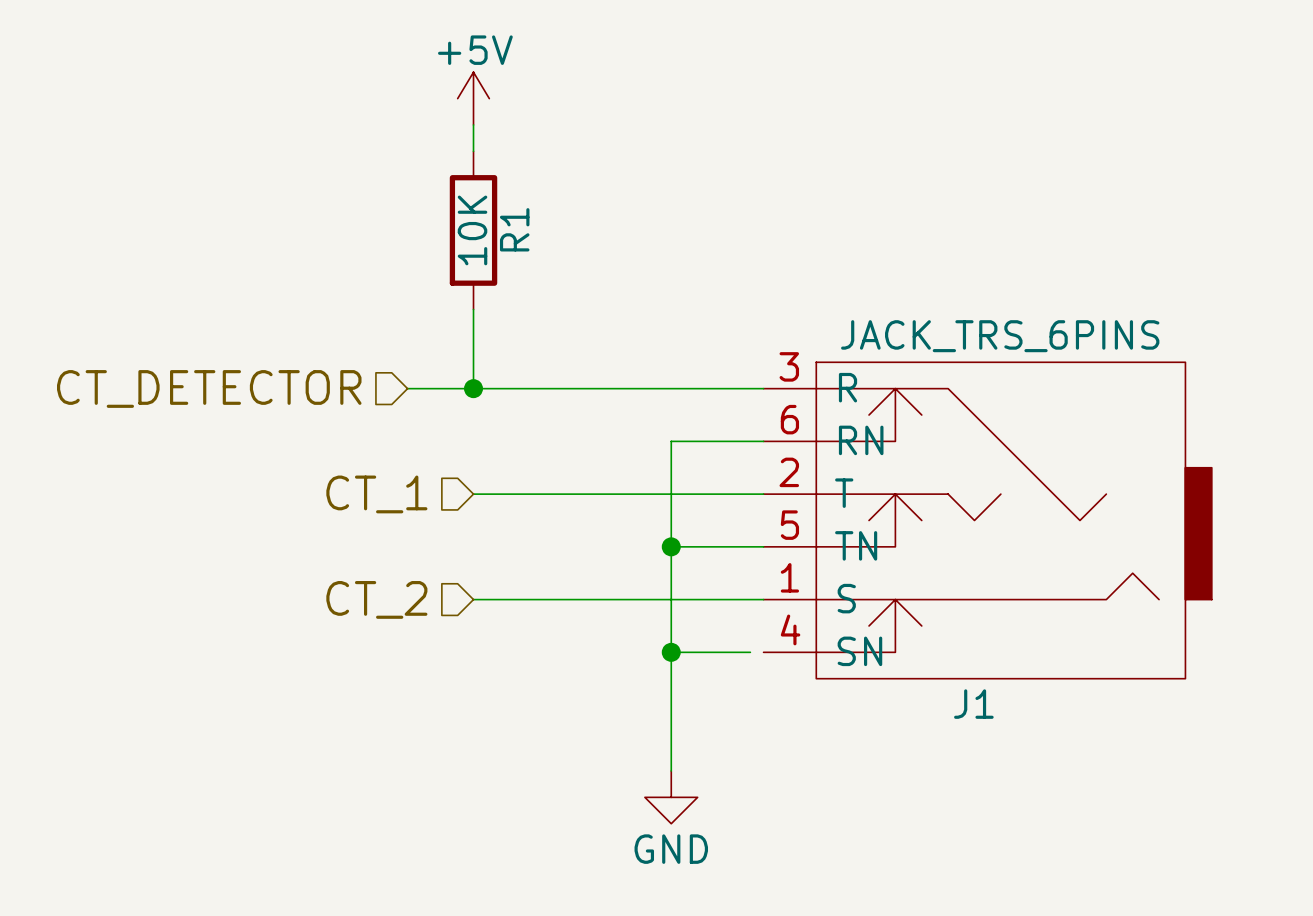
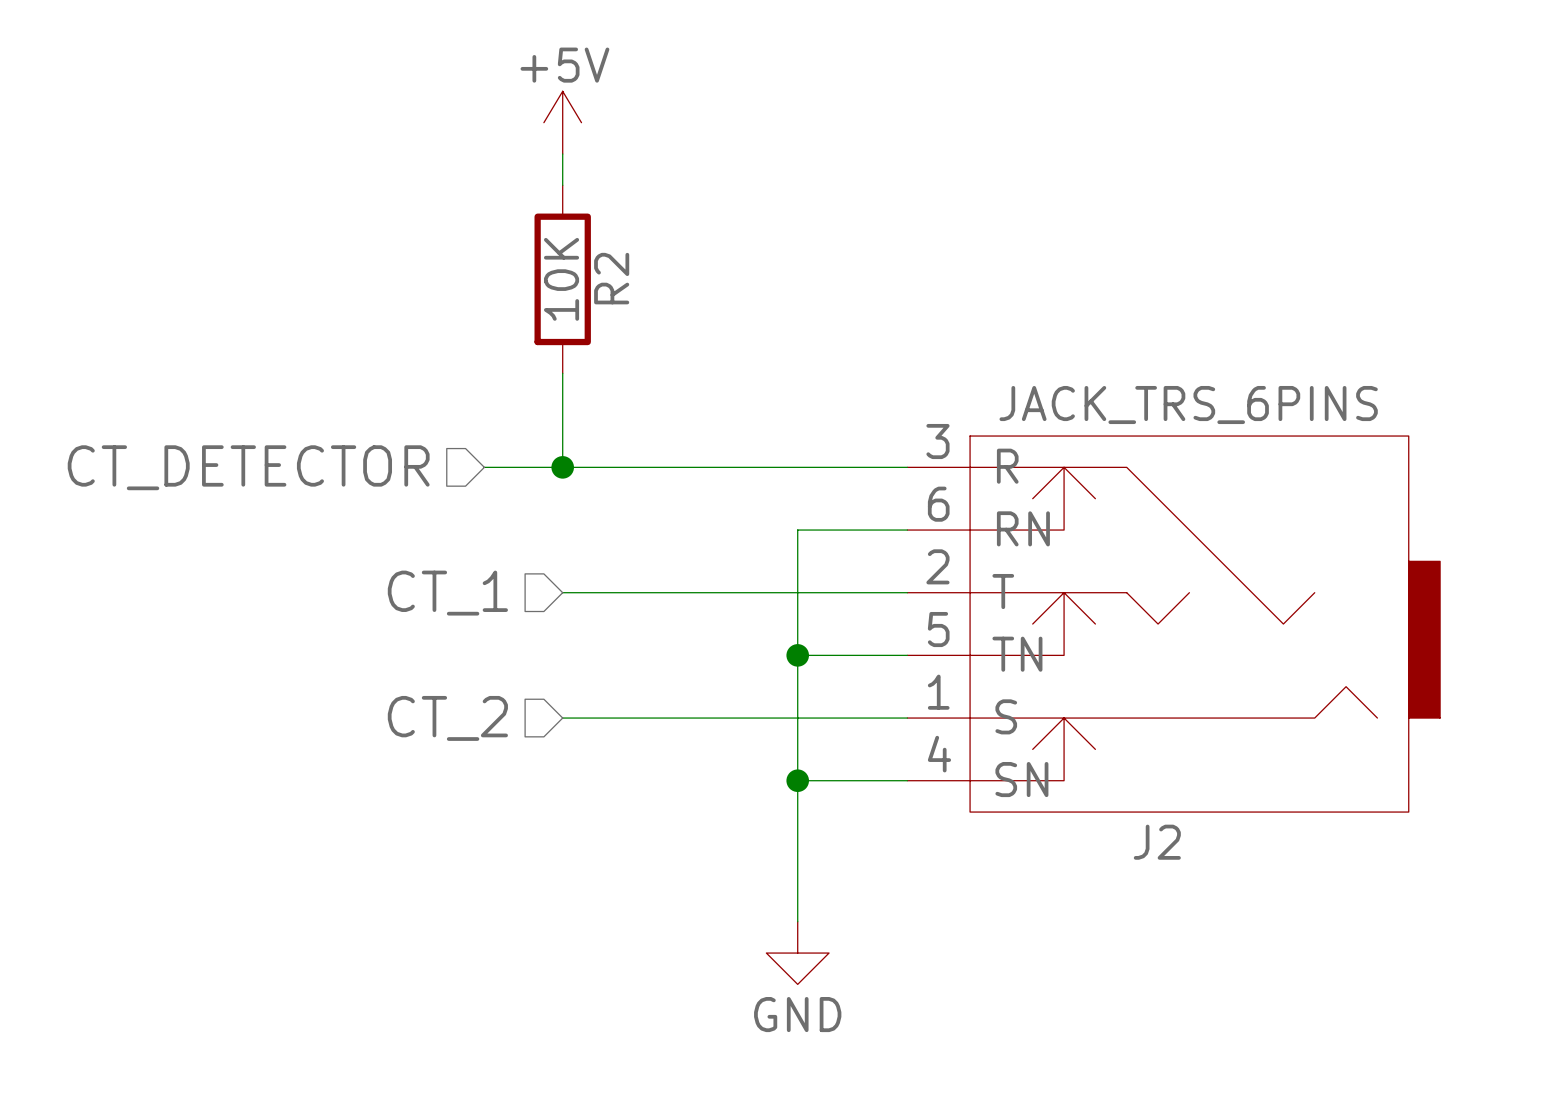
R1 name: R1 (514, 229) -> R2 (611, 278)
wire: none -> (891, 780) (907, 780)
J1 name: J1 (973, 704) -> J2 (1157, 842)

